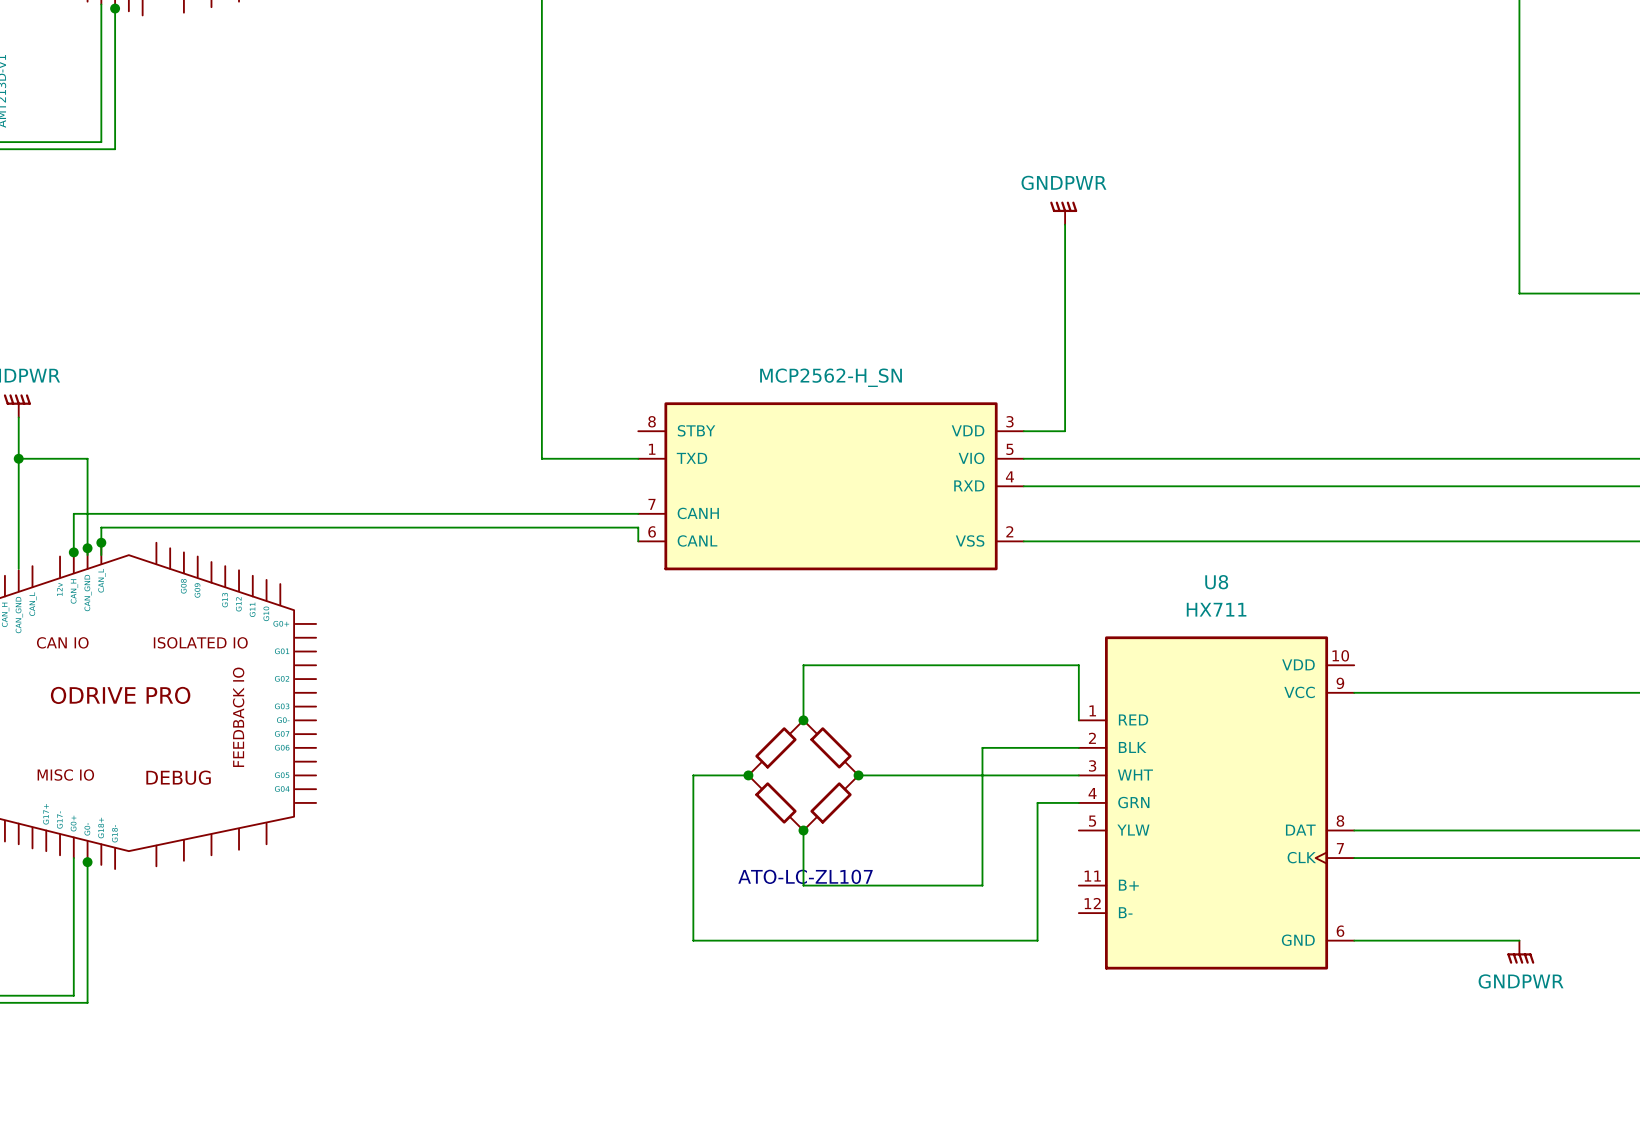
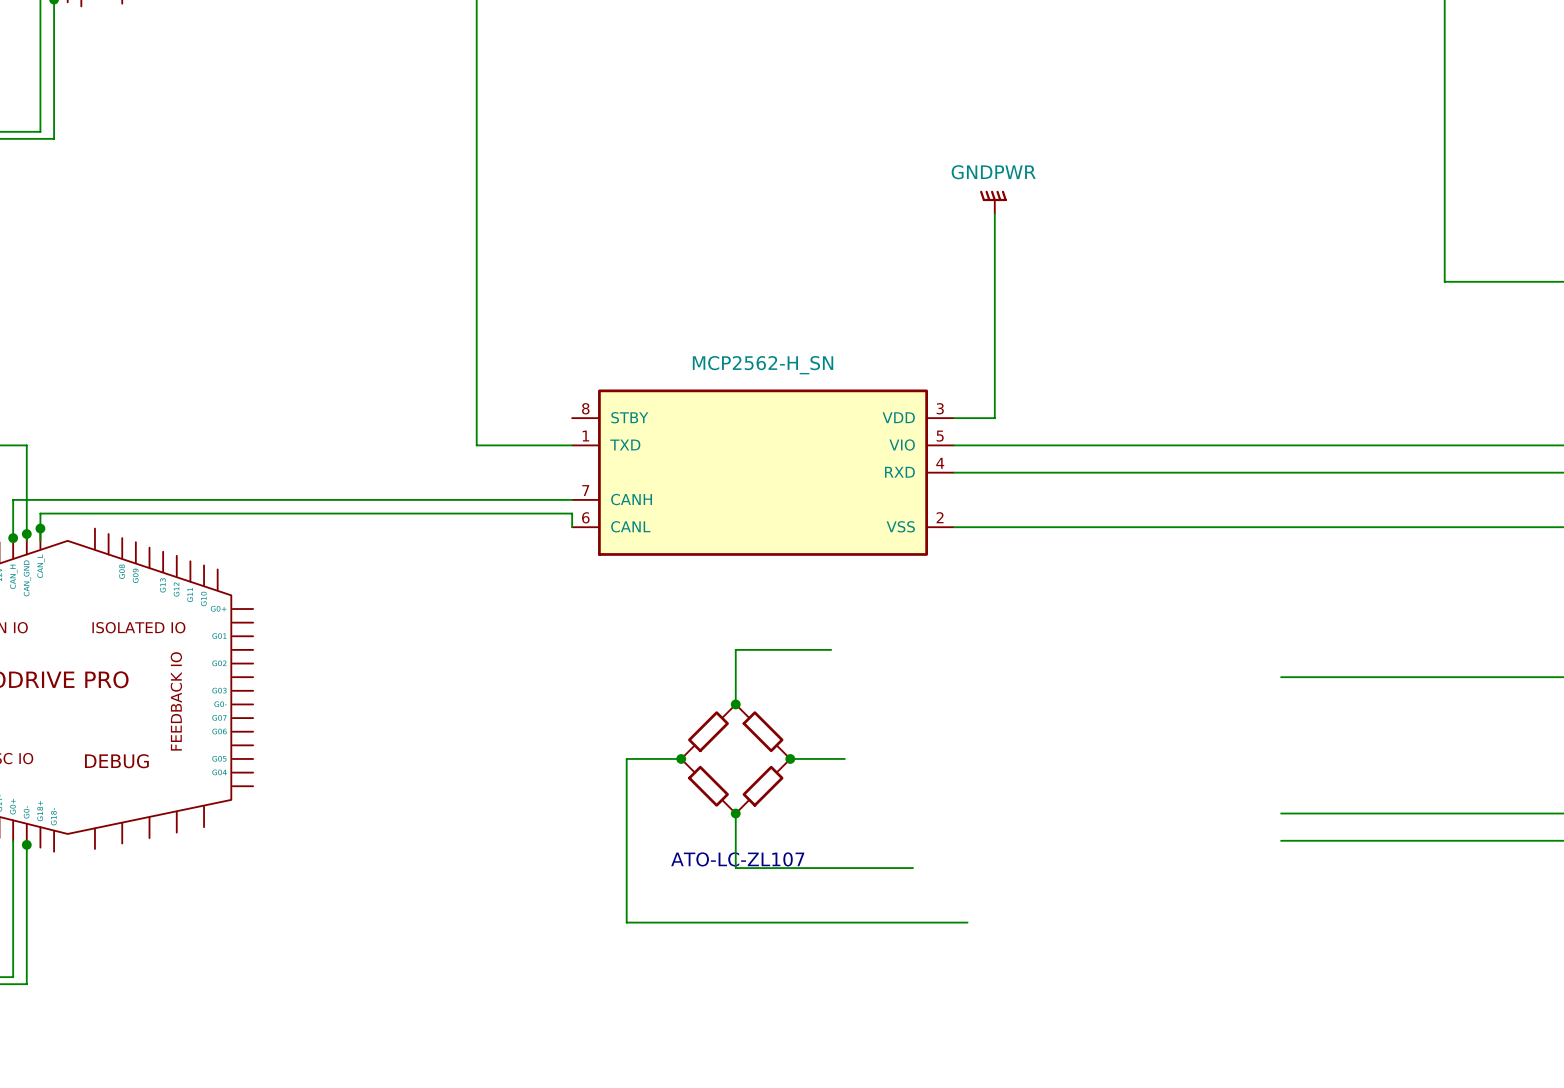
wire: (899, 665) (1078, 665) (1078, 720) -> none
wire: (1078, 747) (982, 747) (982, 885) -> none
wire: (913, 775) (1078, 775) -> none
wire: (1078, 802) (1037, 802) (1037, 940) -> none
U8: HX711 (1216, 802) -> none
wire: (1354, 940) (1519, 940) -> none
power symbol: GNDPWR (1520, 952) -> none

